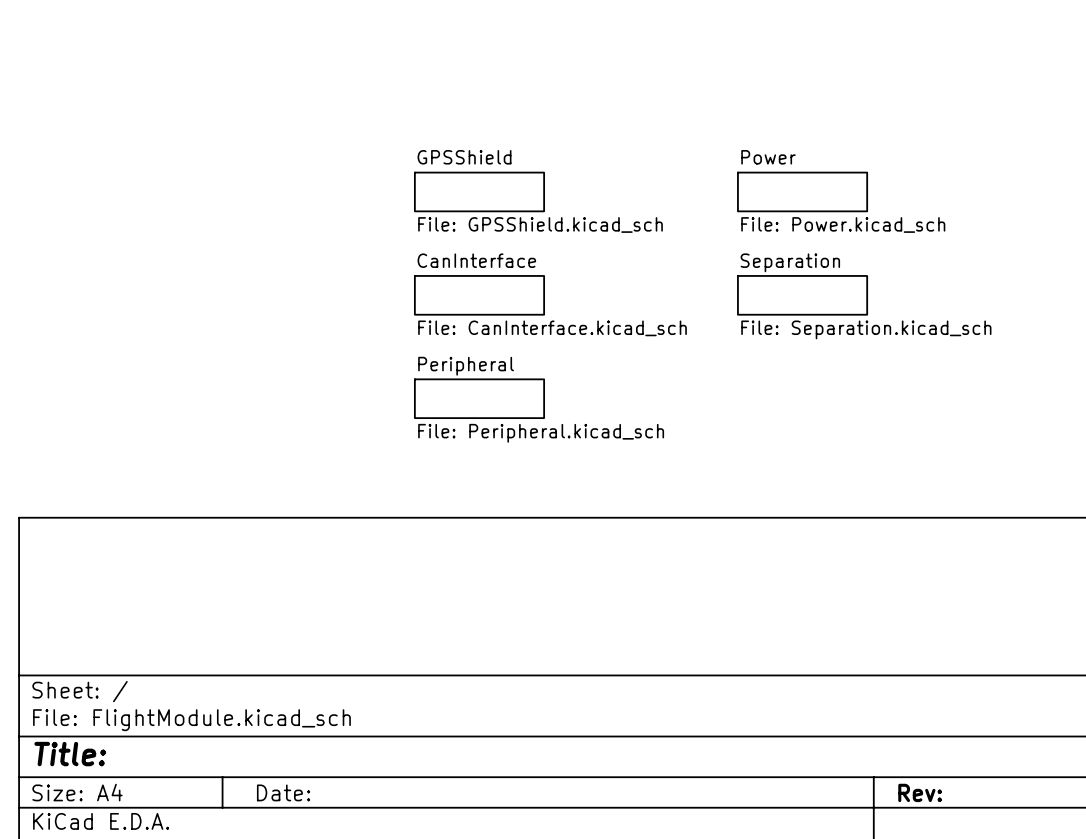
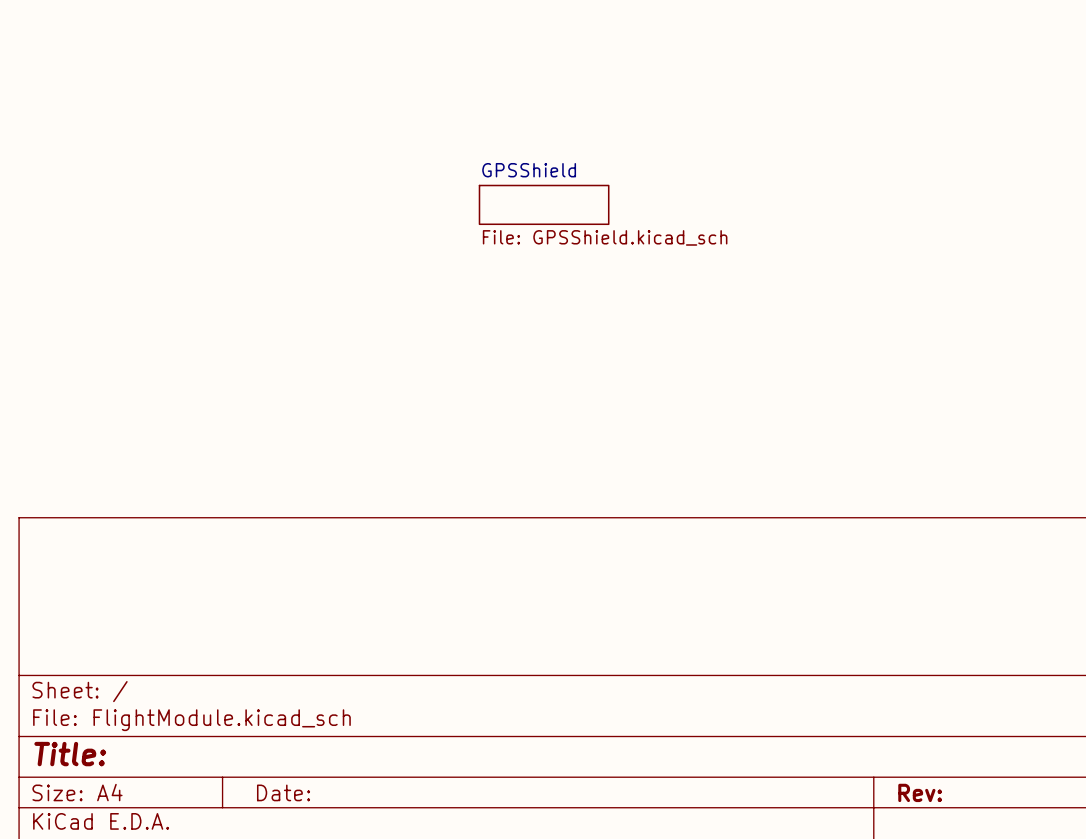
sheet GPSShield position: (479, 191) -> (544, 204)
sheet Power: File: Power.kicad_sch (802, 191) -> none
sheet CanInterface: File: CanInterface.kicad_sch (479, 295) -> none
sheet Separation: File: Separation.kicad_sch (802, 295) -> none
sheet Peripheral: File: Peripheral.kicad_sch (479, 398) -> none

